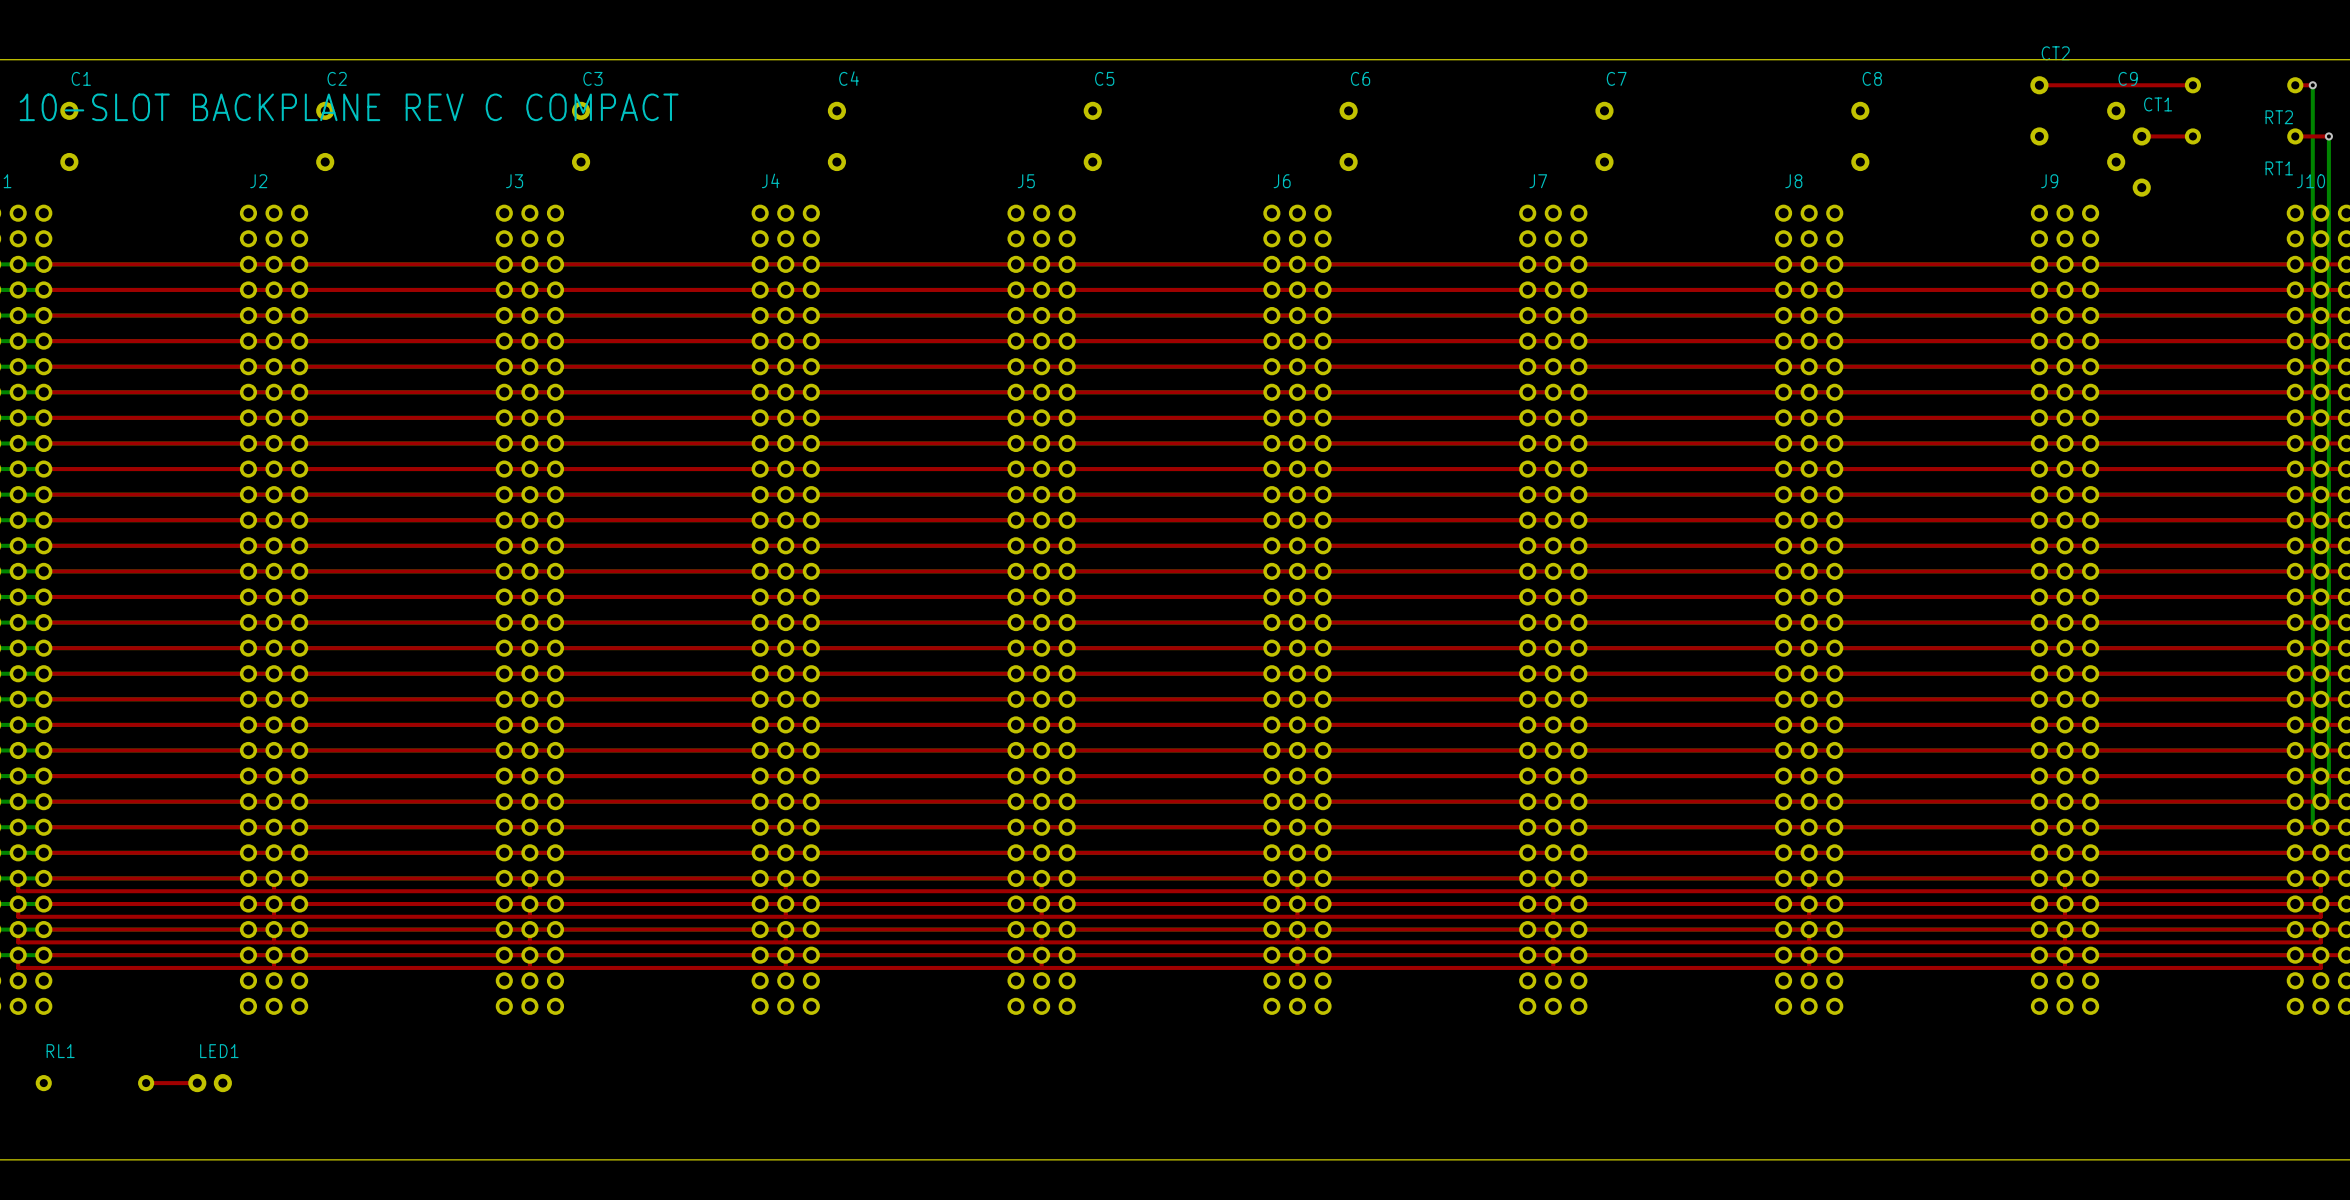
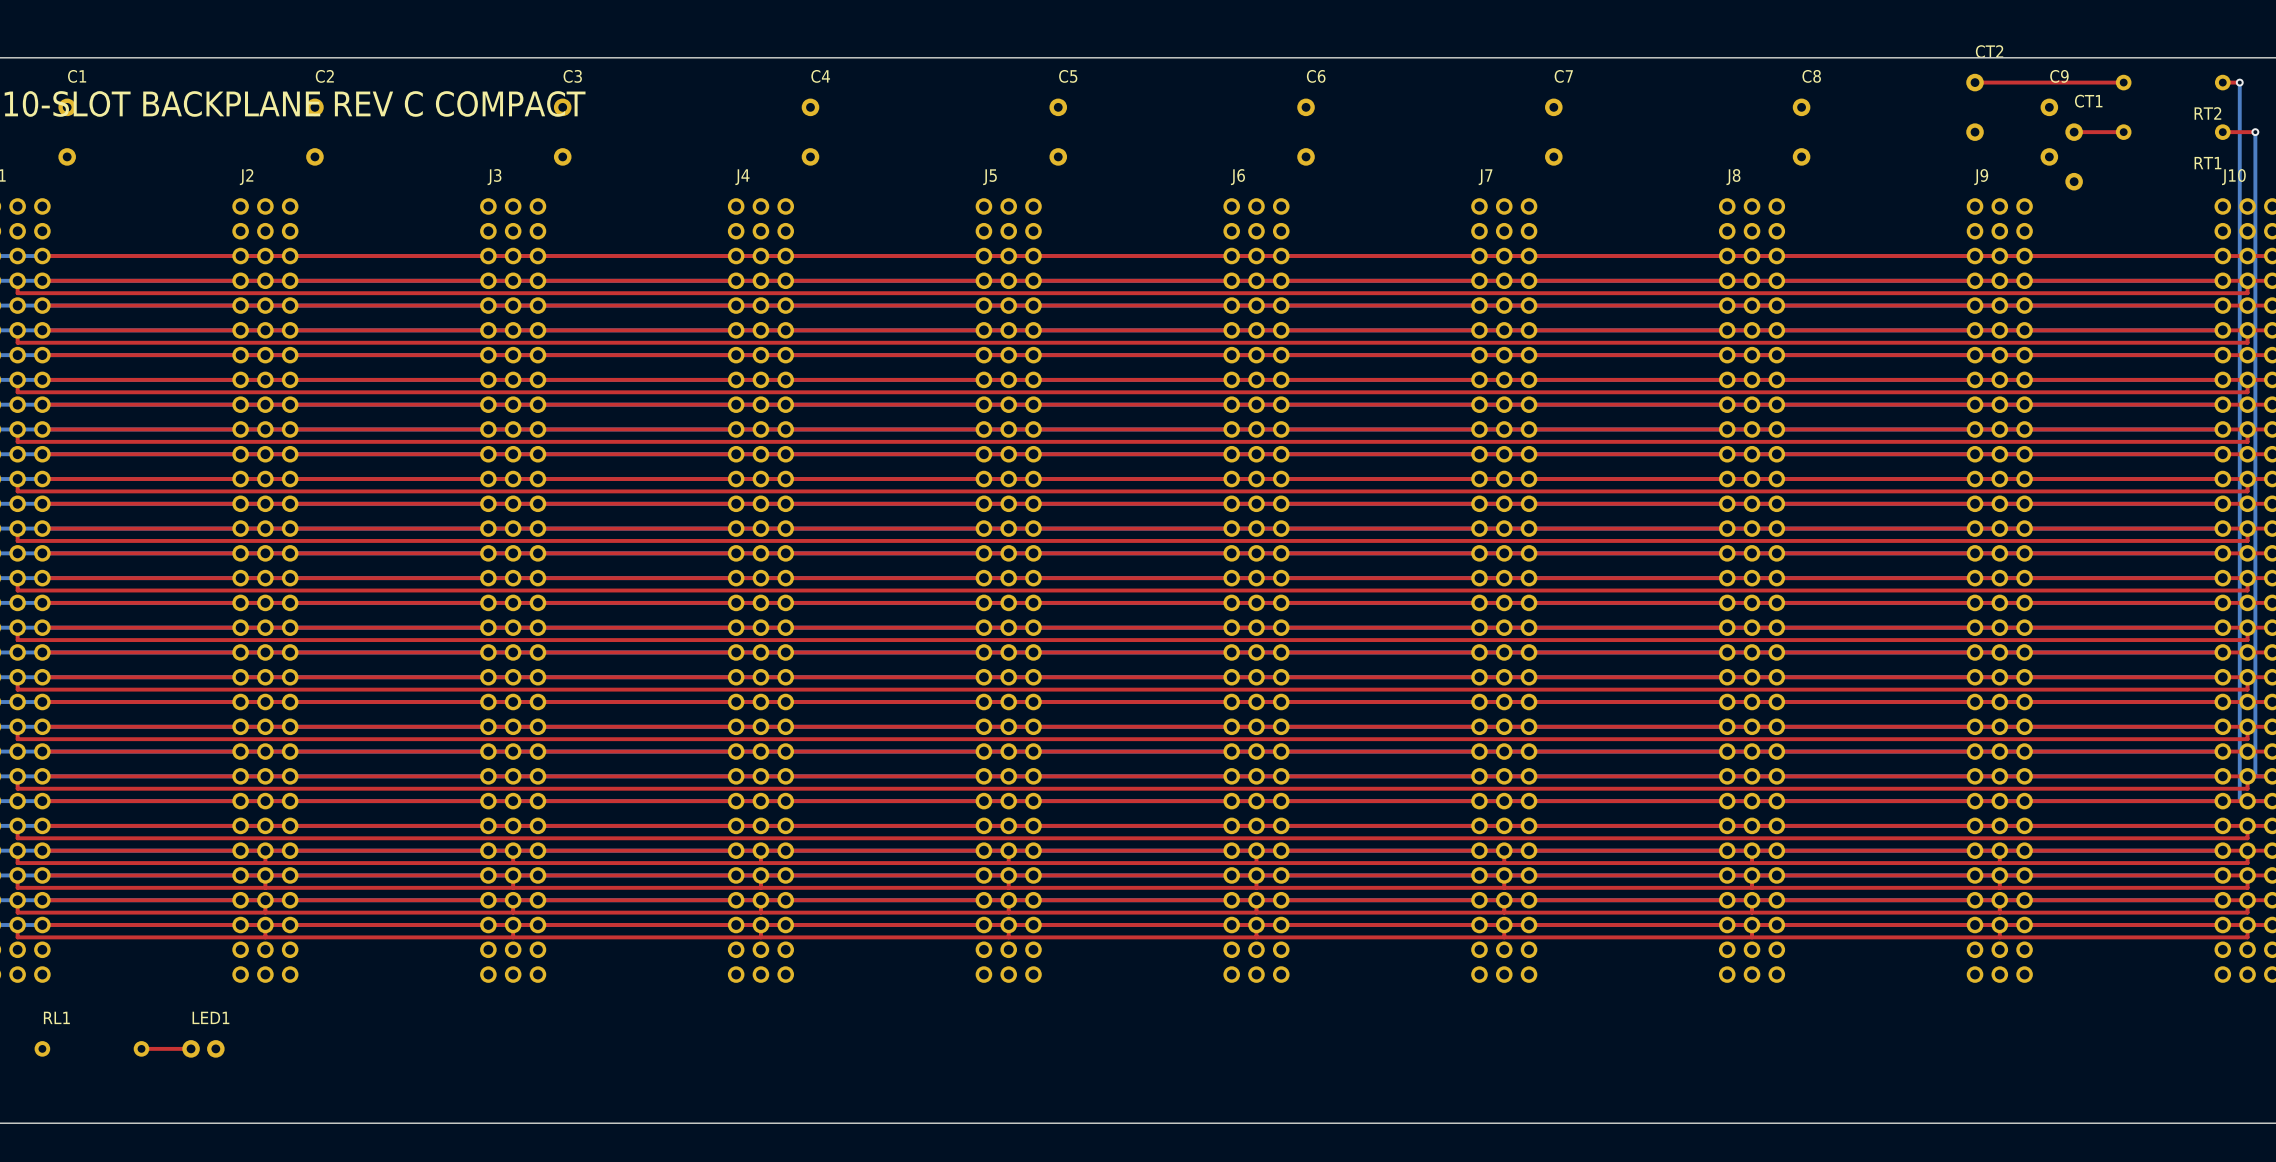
top track: none -> (17, 280) (17, 293) (2247, 293) (2247, 280)
top track: none -> (17, 330) (17, 342) (2247, 342) (2247, 330)
top track: none -> (17, 379) (17, 392) (2247, 392) (2247, 379)
top track: none -> (17, 429) (17, 441) (2247, 441) (2247, 429)
top track: none -> (17, 479) (17, 491) (2247, 491) (2247, 479)
top track: none -> (17, 528) (17, 540) (2247, 540) (2247, 528)
top track: none -> (17, 578) (17, 590) (2247, 590) (2247, 578)
top track: none -> (17, 627) (17, 640) (2247, 640) (2247, 627)
top track: none -> (17, 677) (17, 689) (2247, 689) (2247, 677)
top track: none -> (17, 726) (17, 739) (2247, 739) (2247, 726)
top track: none -> (17, 776) (17, 788) (2247, 788) (2247, 776)
top track: none -> (17, 825) (17, 838) (2247, 838) (2247, 825)

